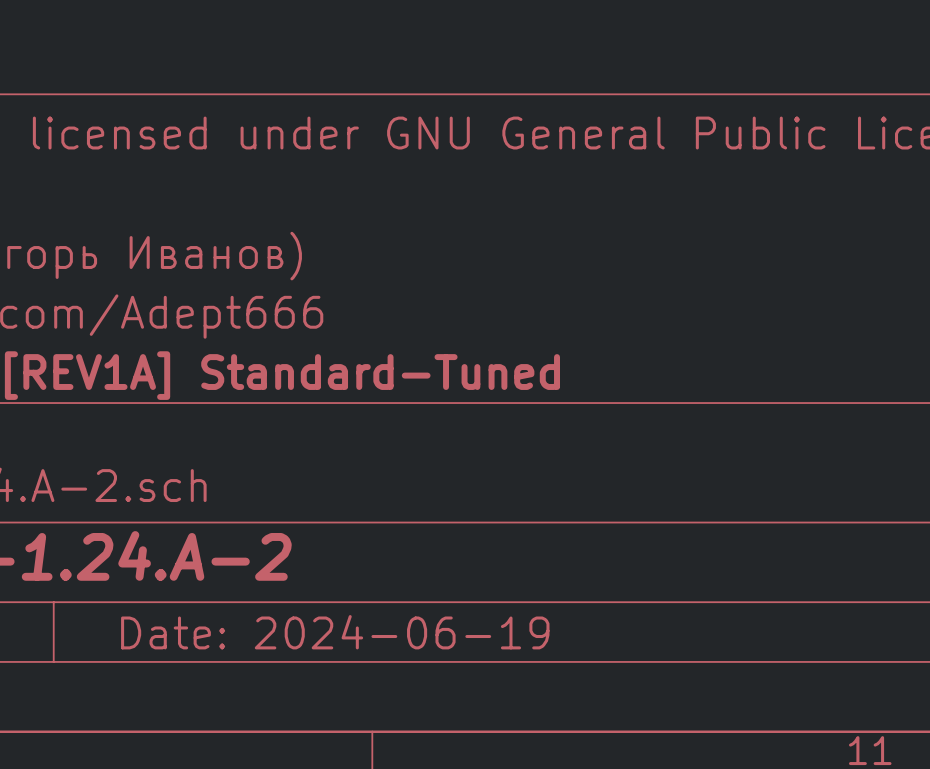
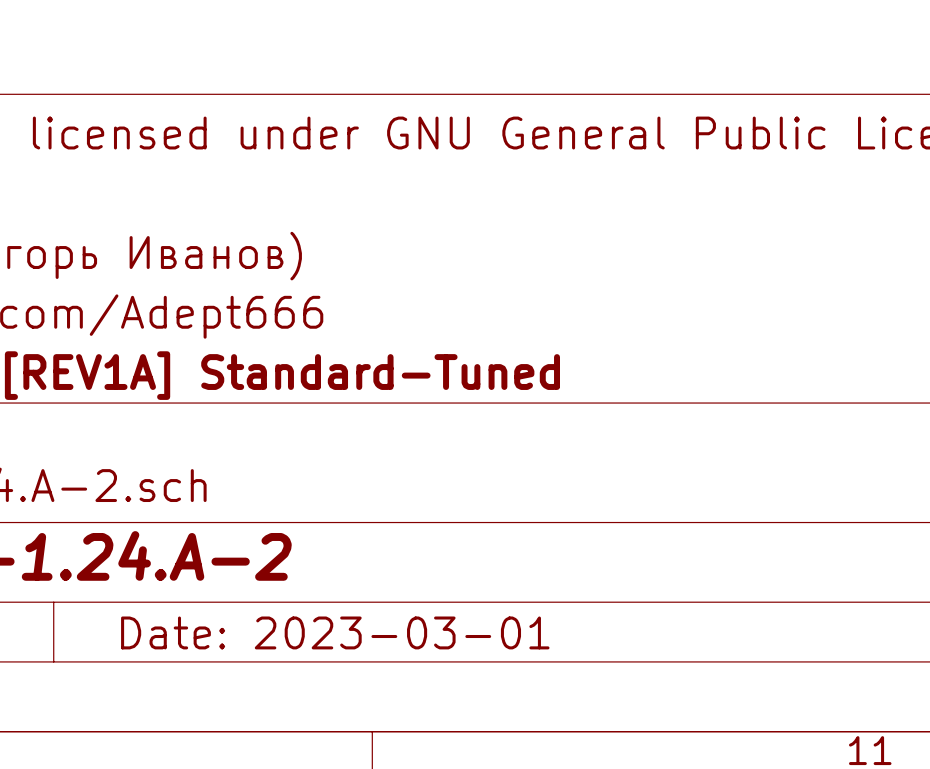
title block: Date: 2024-06-19 (335, 632) -> Date: 2023-03-01 (335, 632)

